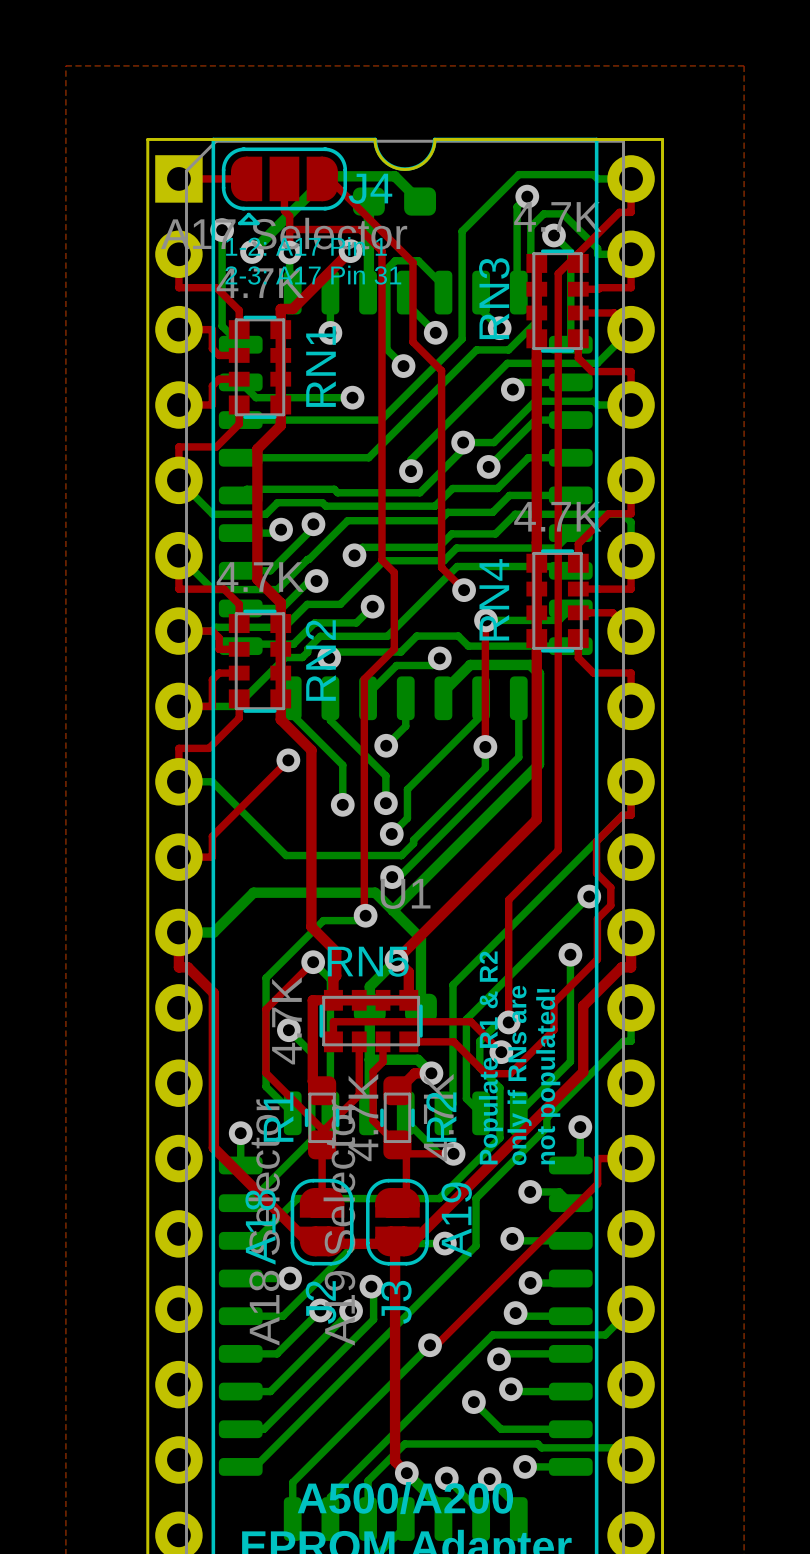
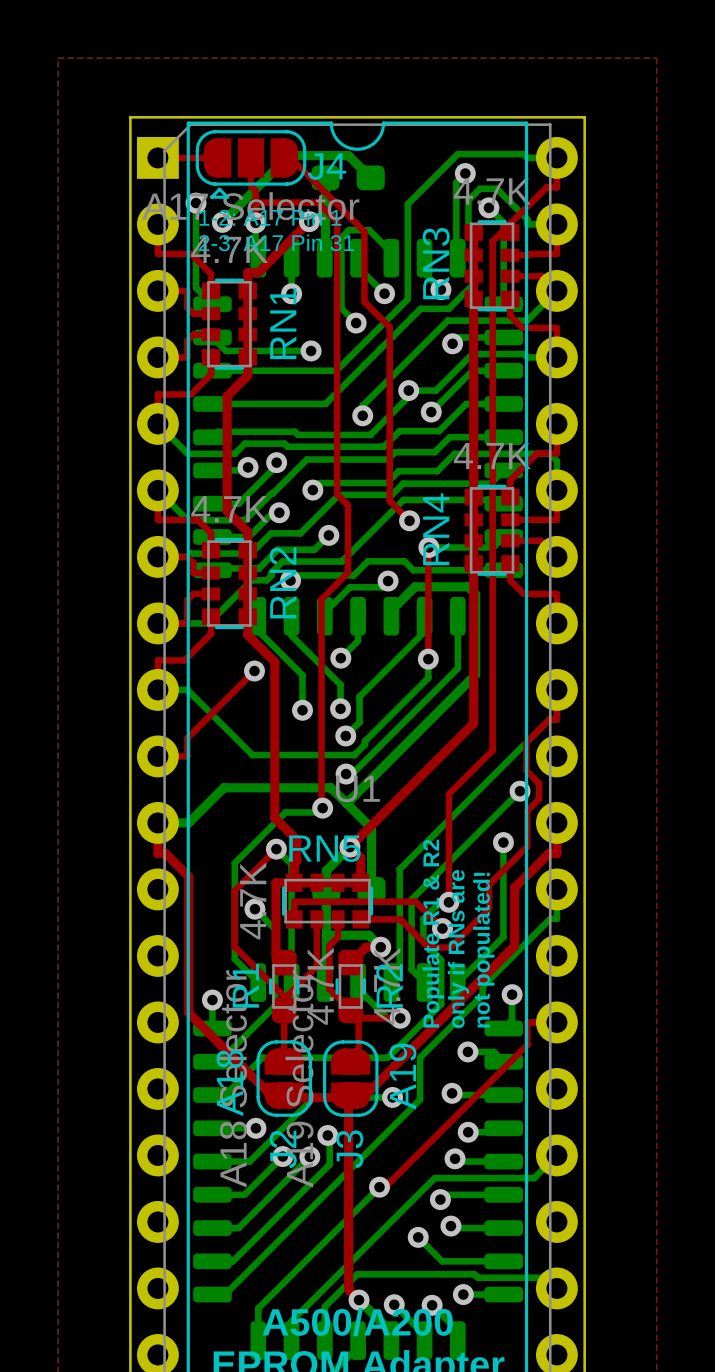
board edge: (147, 139) (375, 139) (377, 150) (383, 160) (393, 167) (405, 169) (416, 167) (426, 160) (432, 150) (434, 139) (662, 139) -> (130, 123) (130, 117) (584, 117) (584, 123)

